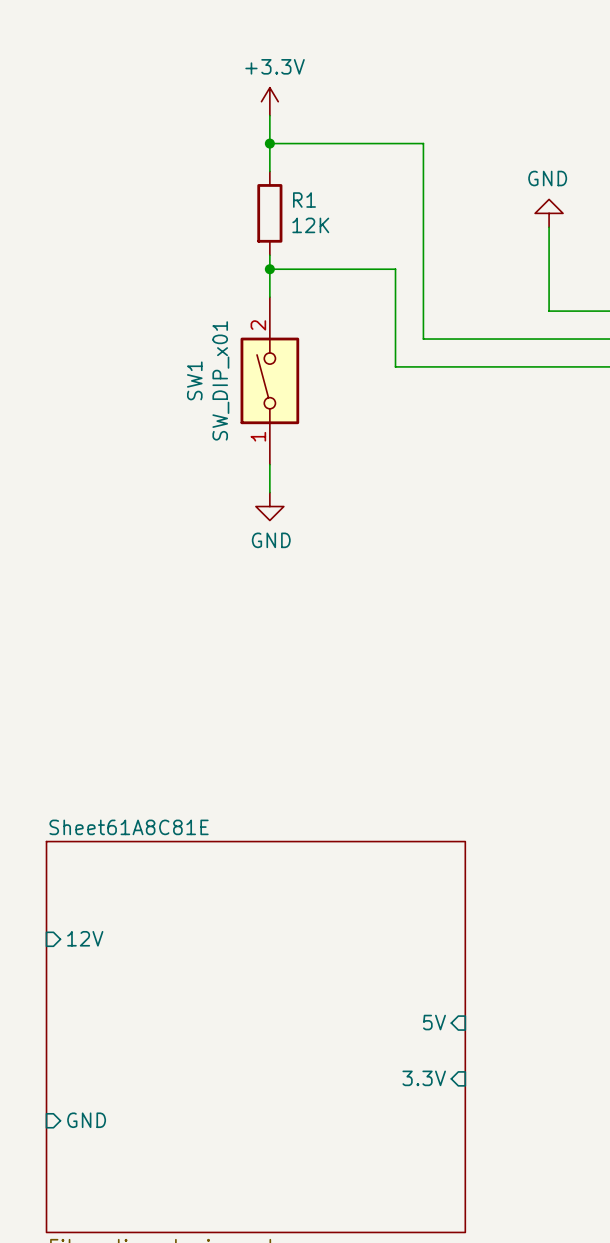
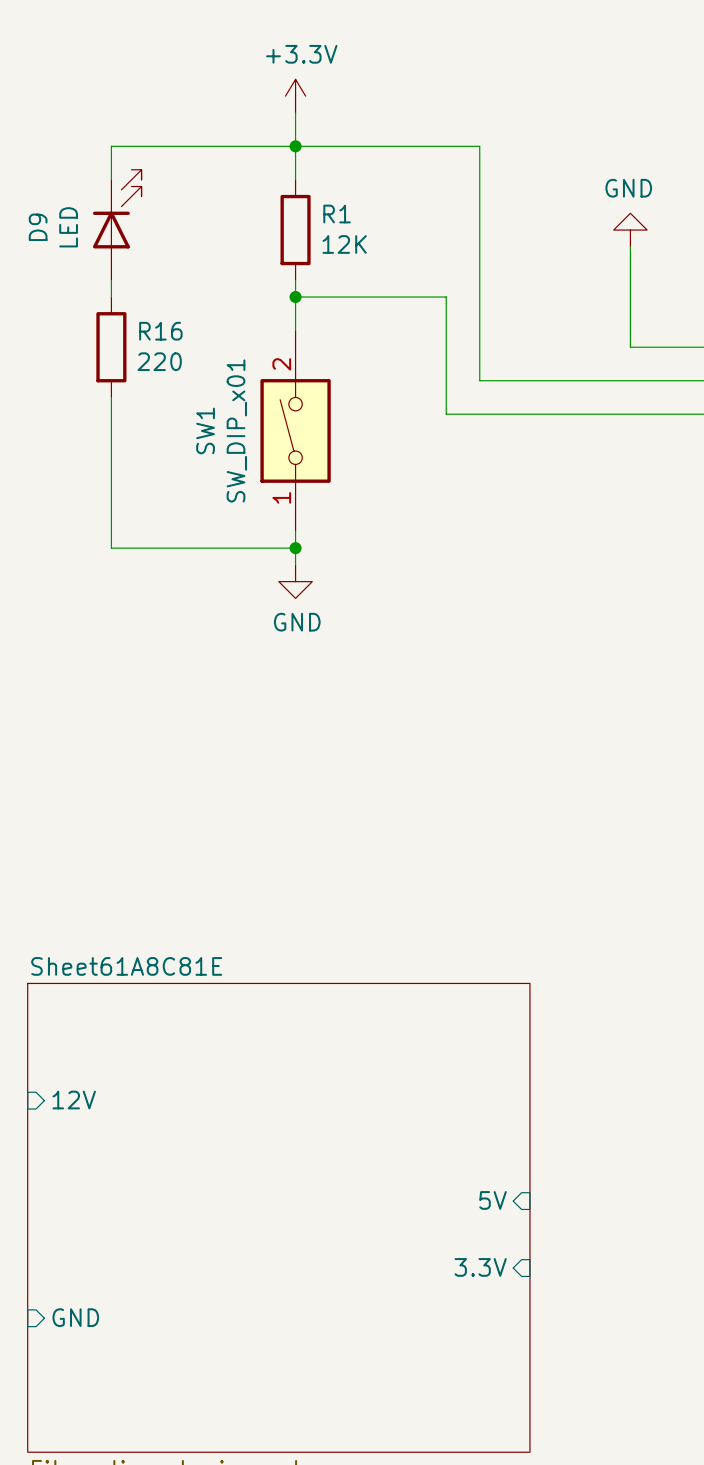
wire: none -> (295, 146) (111, 146) (111, 179)
D9: none -> LED (117, 225)
wire: none -> (111, 280) (111, 297)
R16: none -> 220 (111, 347)
wire: none -> (111, 397) (111, 548) (295, 548)
junction: none -> (295, 548)

